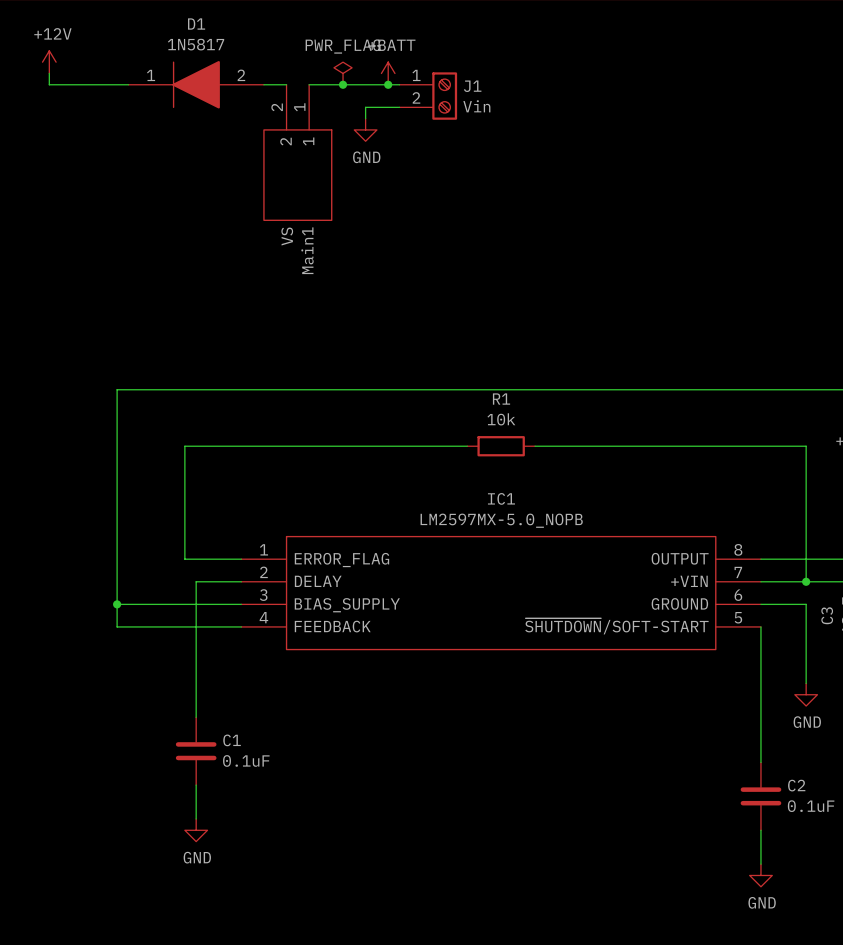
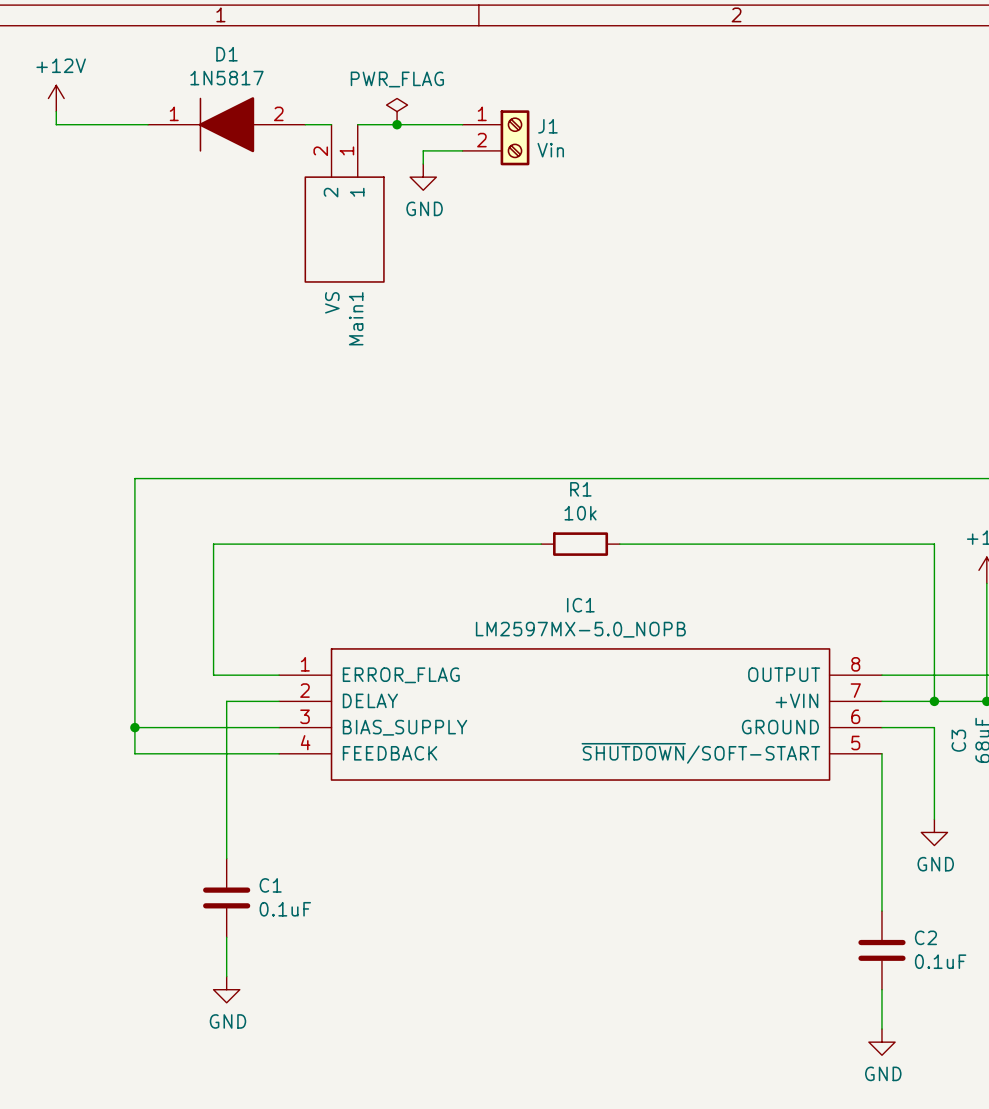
power symbol: +BATT (388, 73) -> none
junction: (388, 84) -> none

